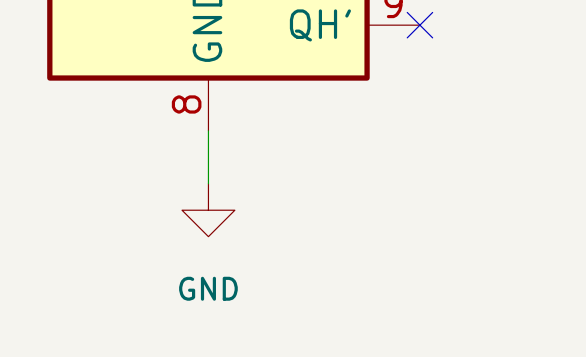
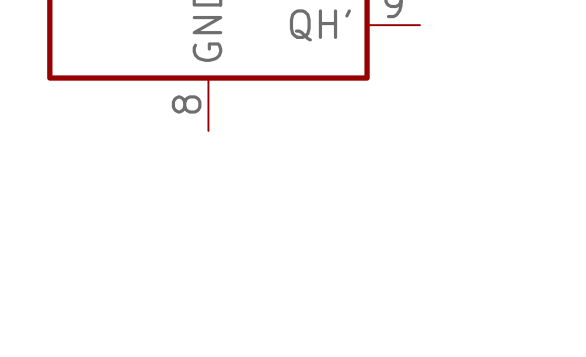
no-connect mark: (419, 25) -> none
wire: (208, 130) (208, 183) -> none
power symbol: GND (208, 210) -> none

